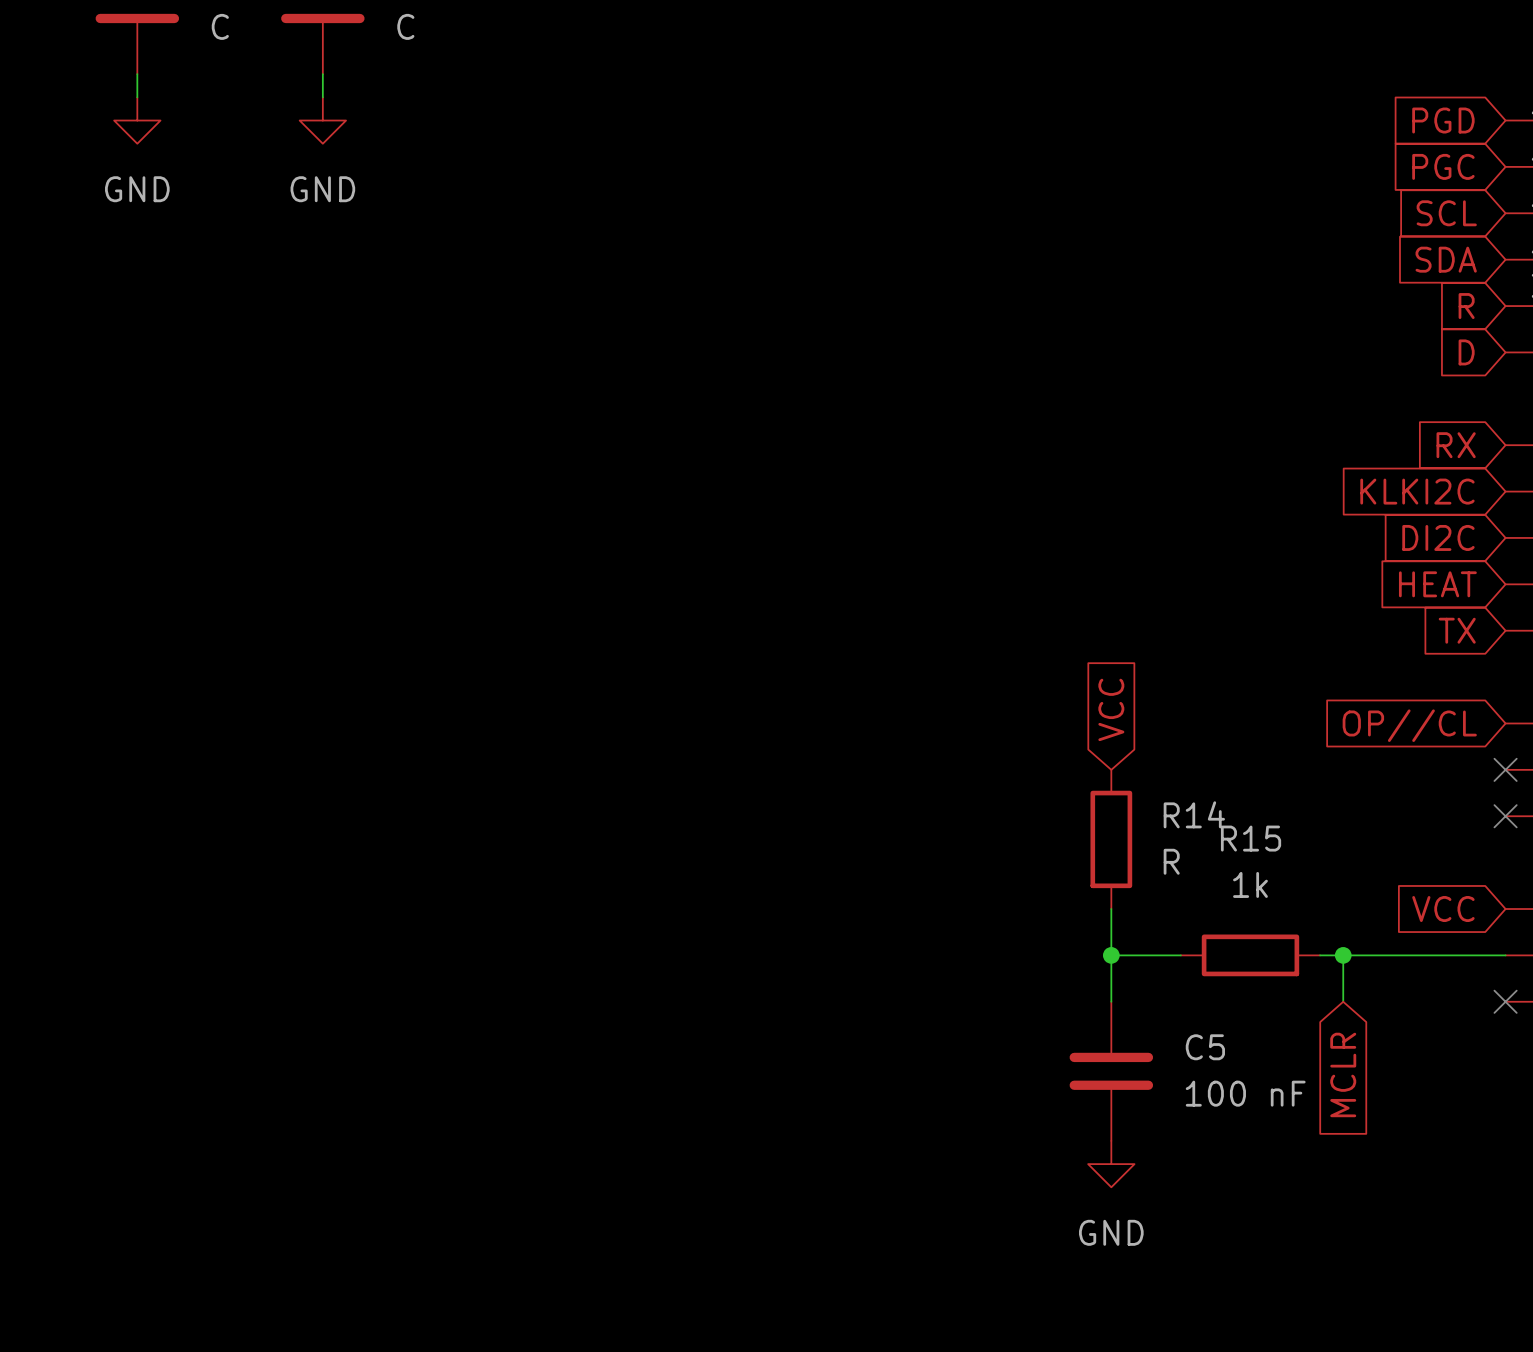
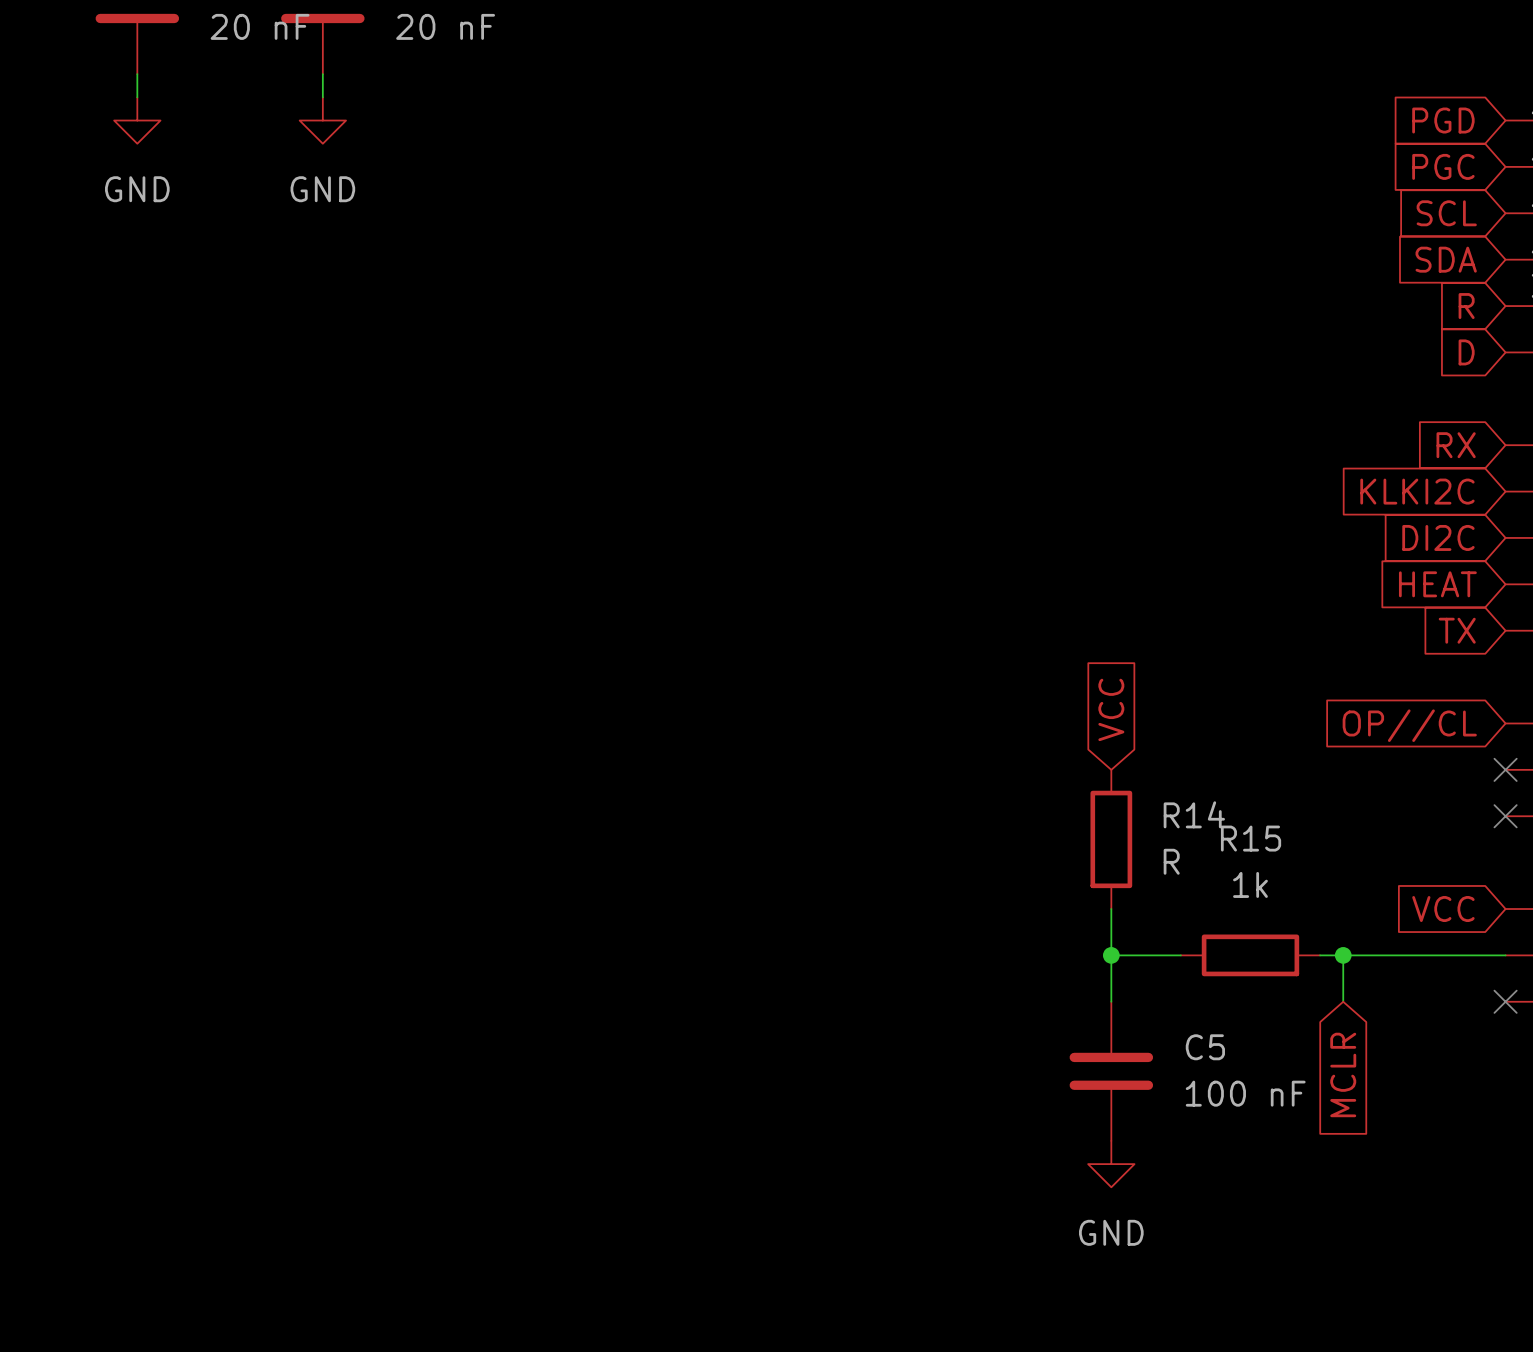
part value: C (220, 26) -> 20 nF (260, 26)
part value: C (405, 26) -> 20 nF (445, 26)

